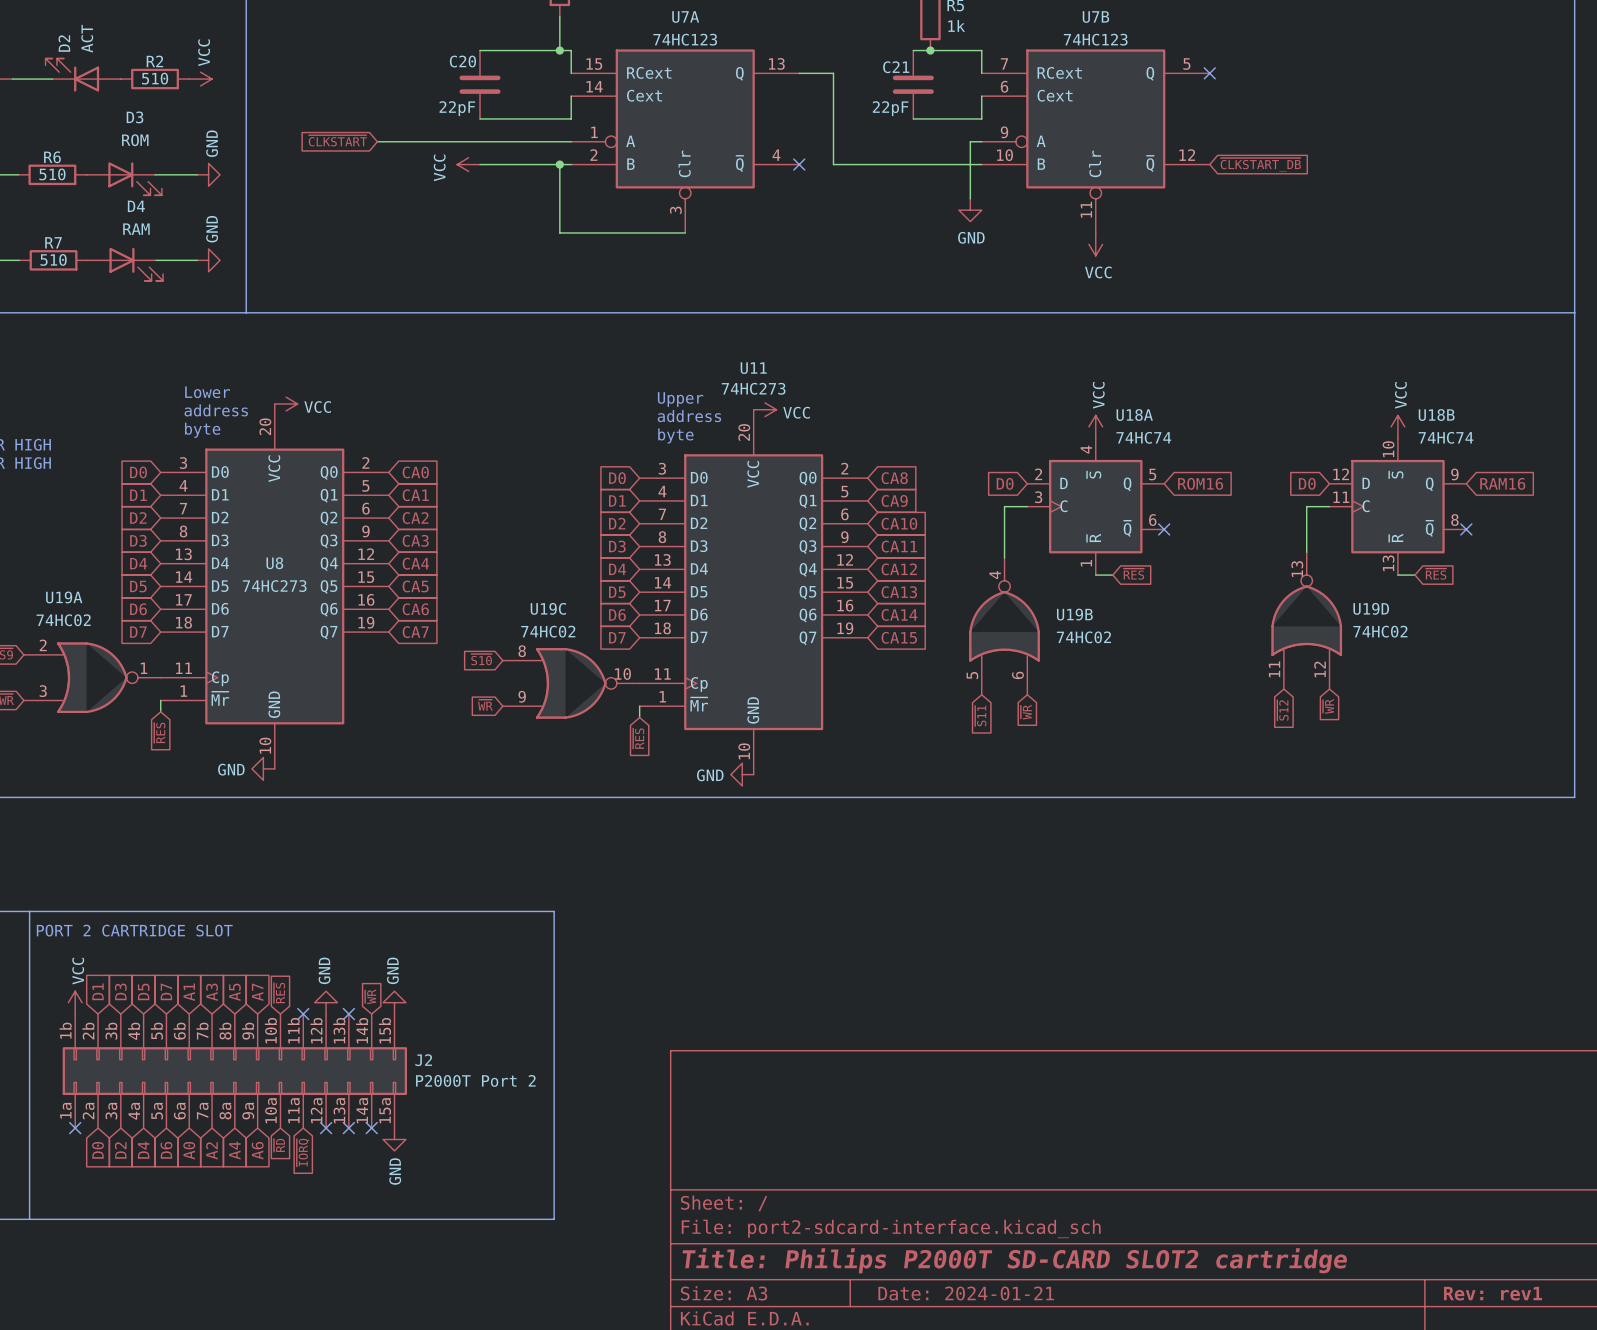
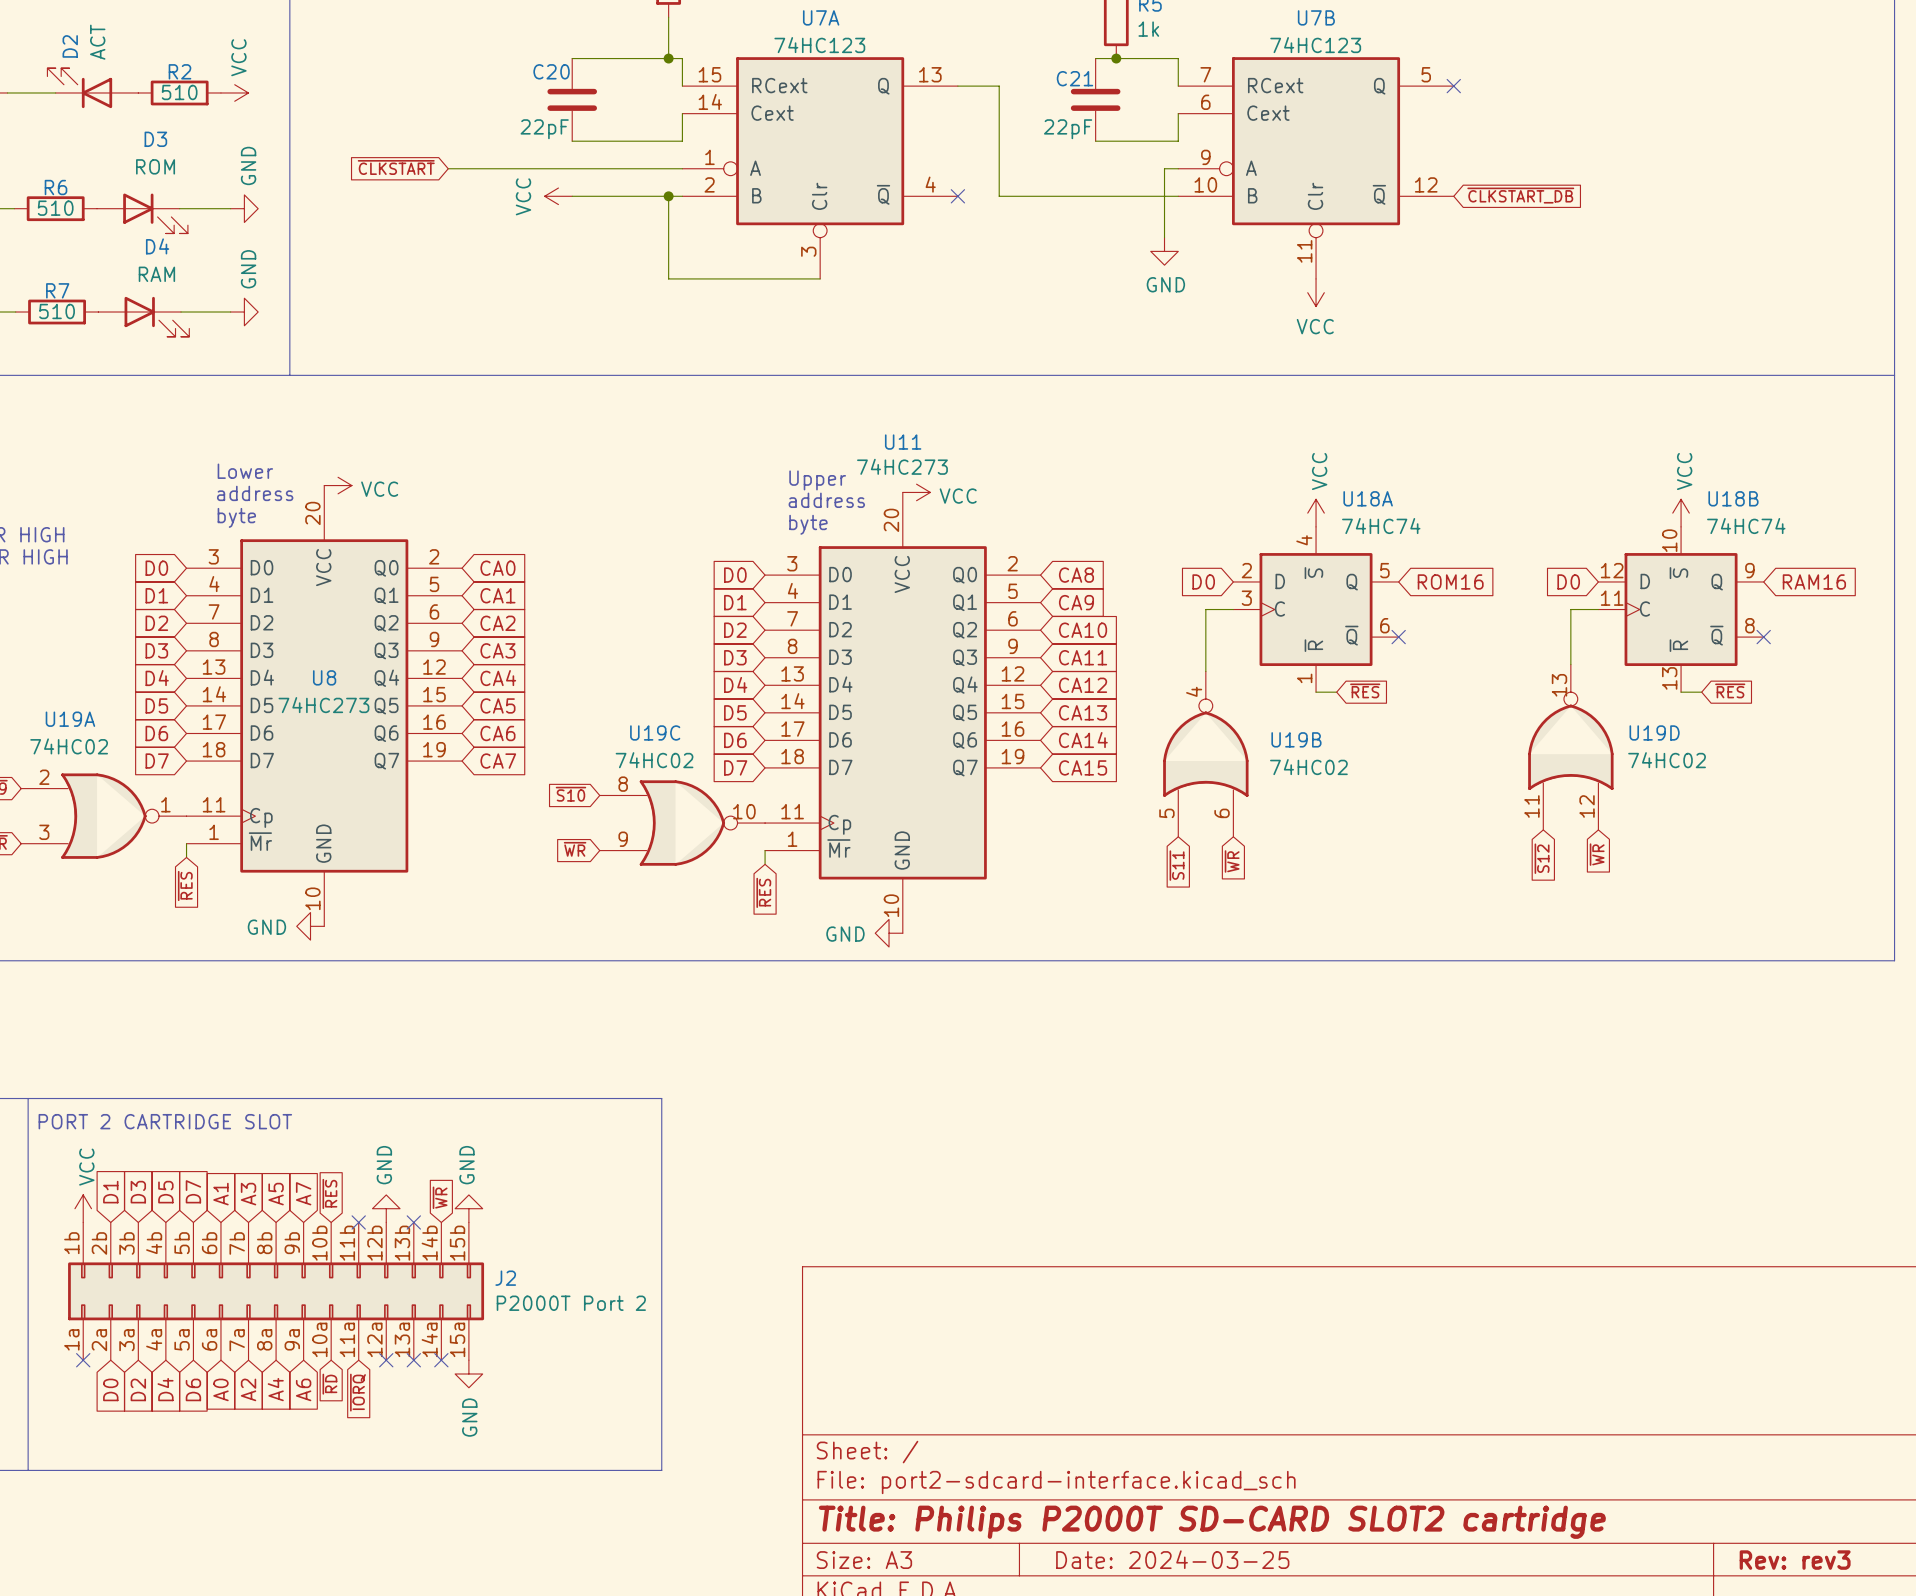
title block: Date: 2024-01-21 (966, 1293) -> Date: 2024-03-25 (1172, 1559)
title block: Rev: rev1 (1493, 1293) -> Rev: rev3 (1795, 1560)

